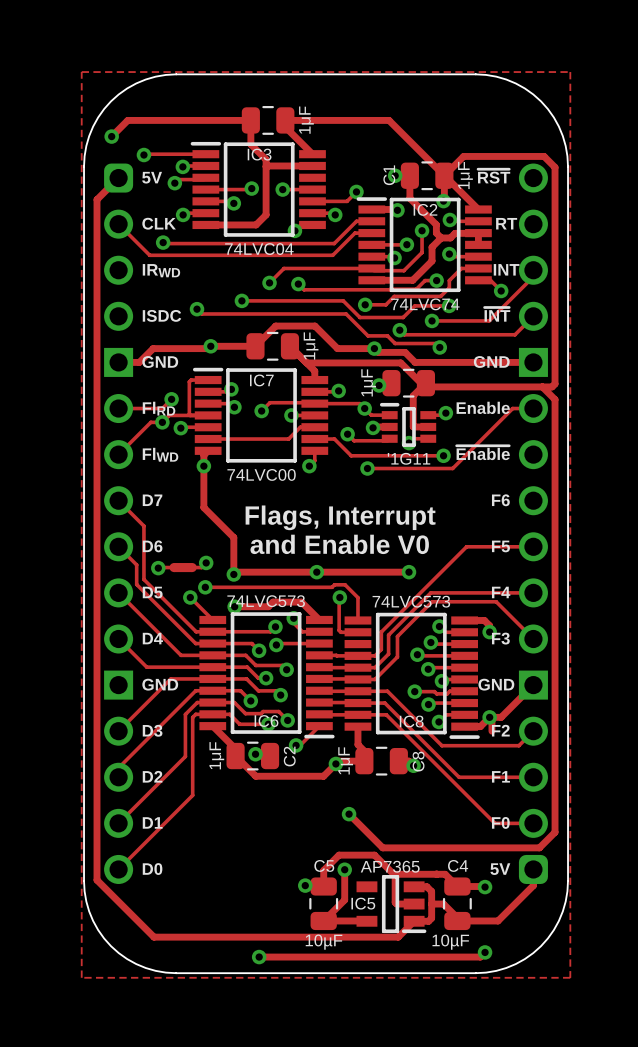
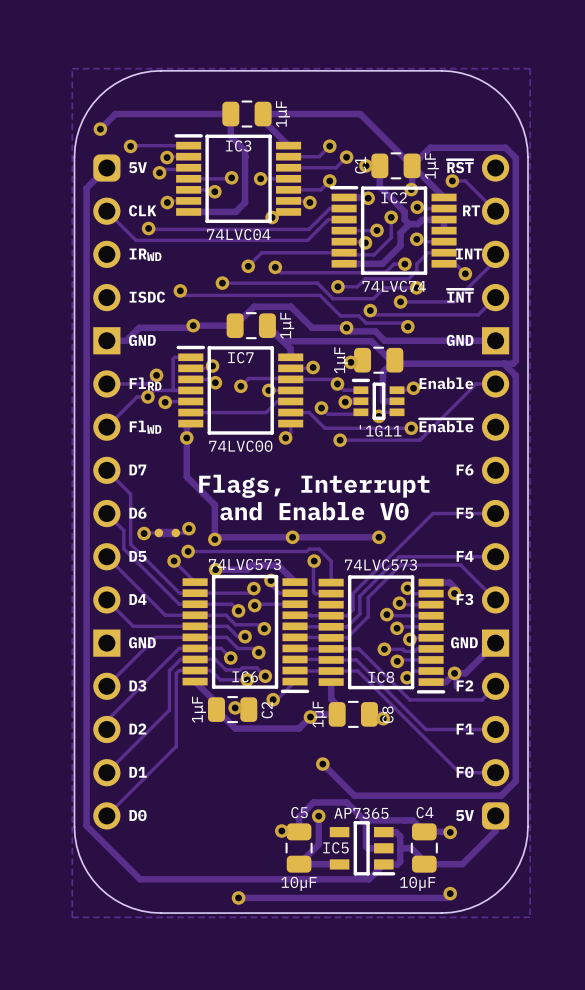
via: none -> (329, 146)
track: (266, 165) (312, 165) -> (329, 146) (319, 156) (288, 156)
track: none -> (346, 157) (336, 167) (288, 167)
via: none -> (346, 157)
track: none -> (452, 180) (465, 180) (495, 211)
via: none -> (452, 180)

